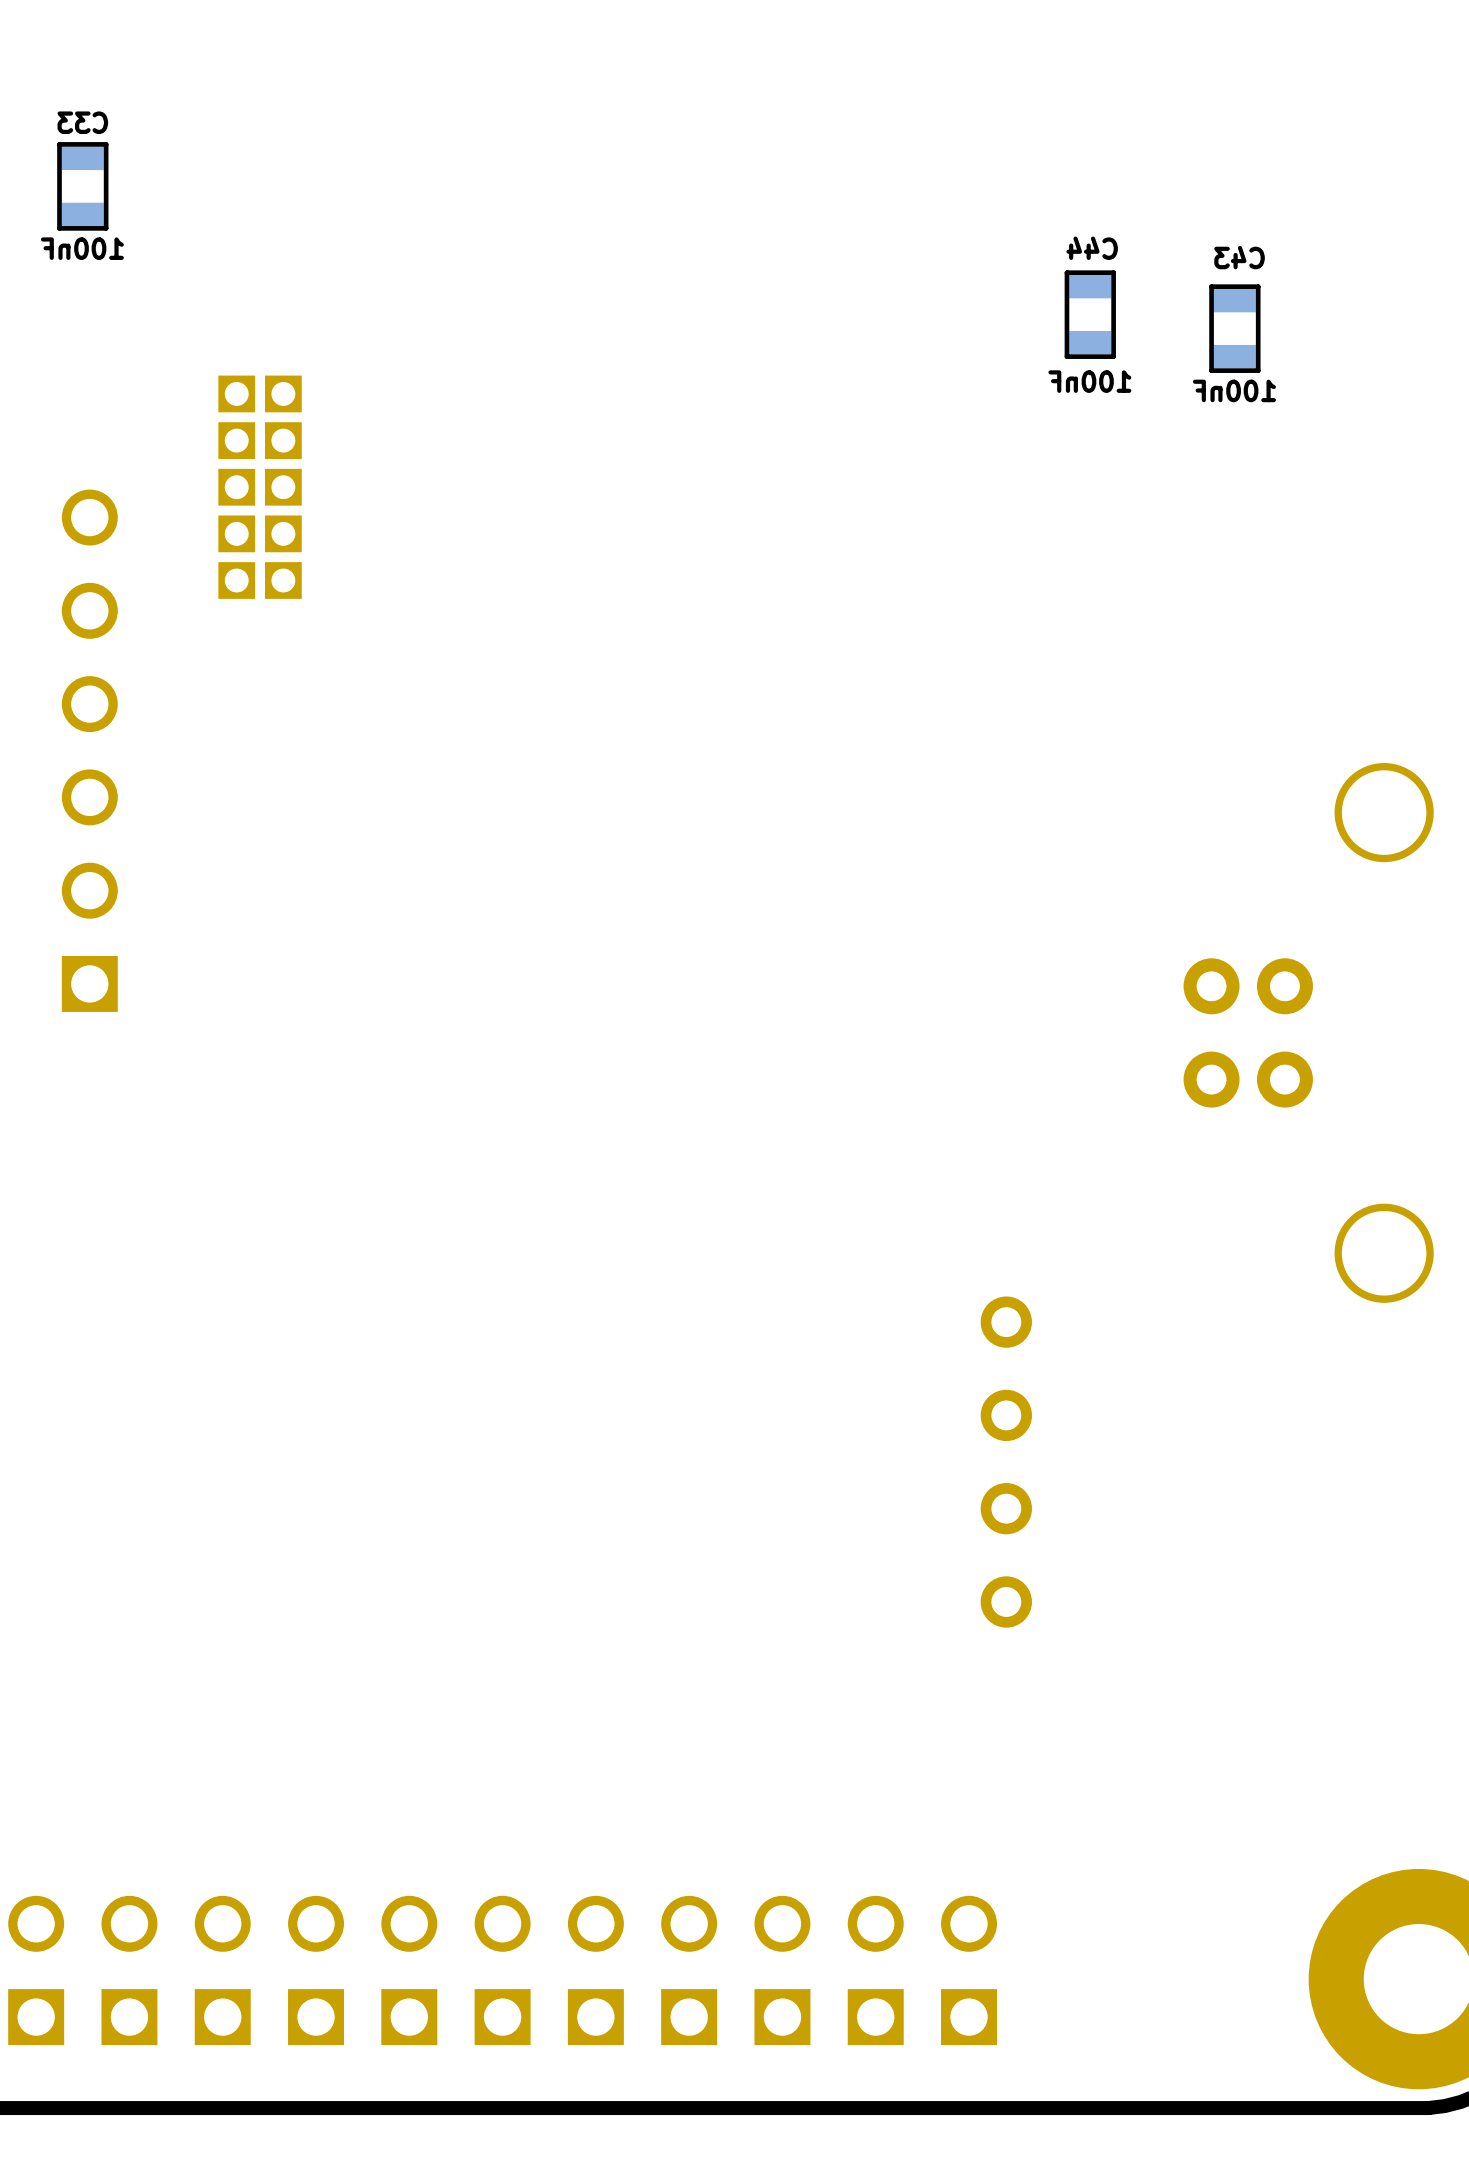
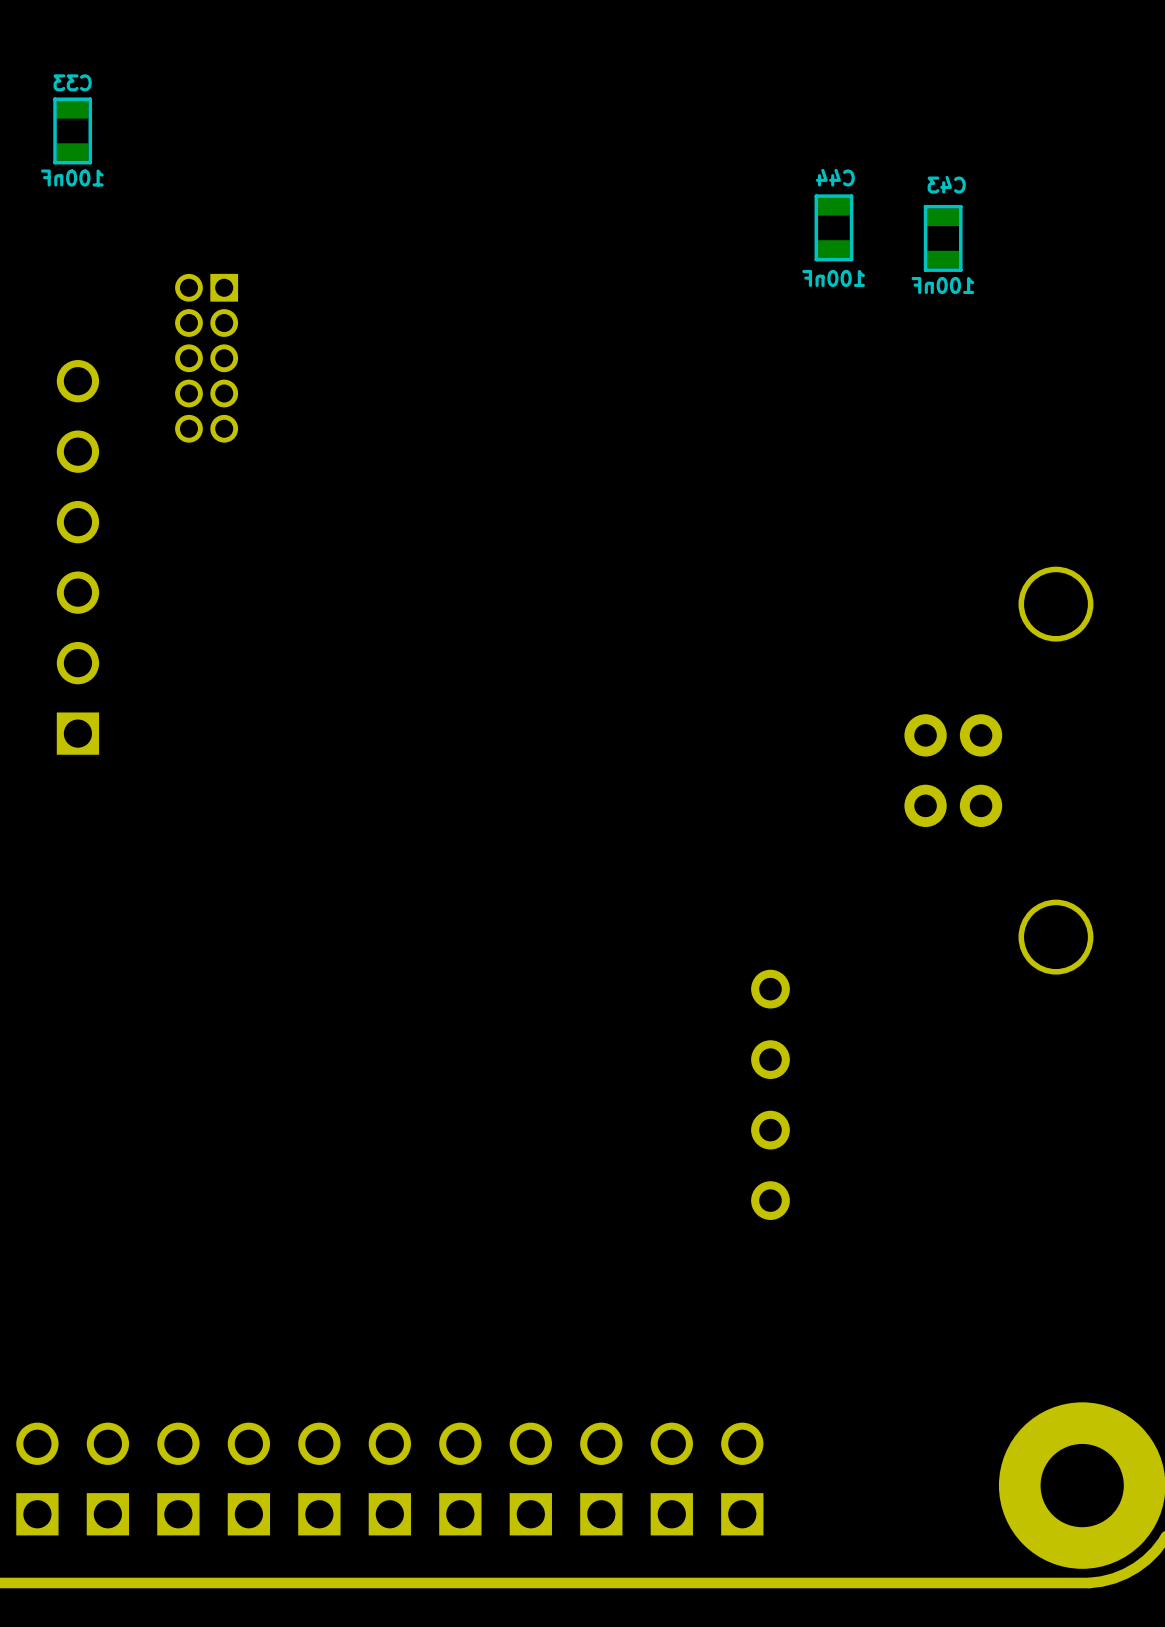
part footprint: [218, 375, 302, 599] -> [175, 273, 239, 443]

